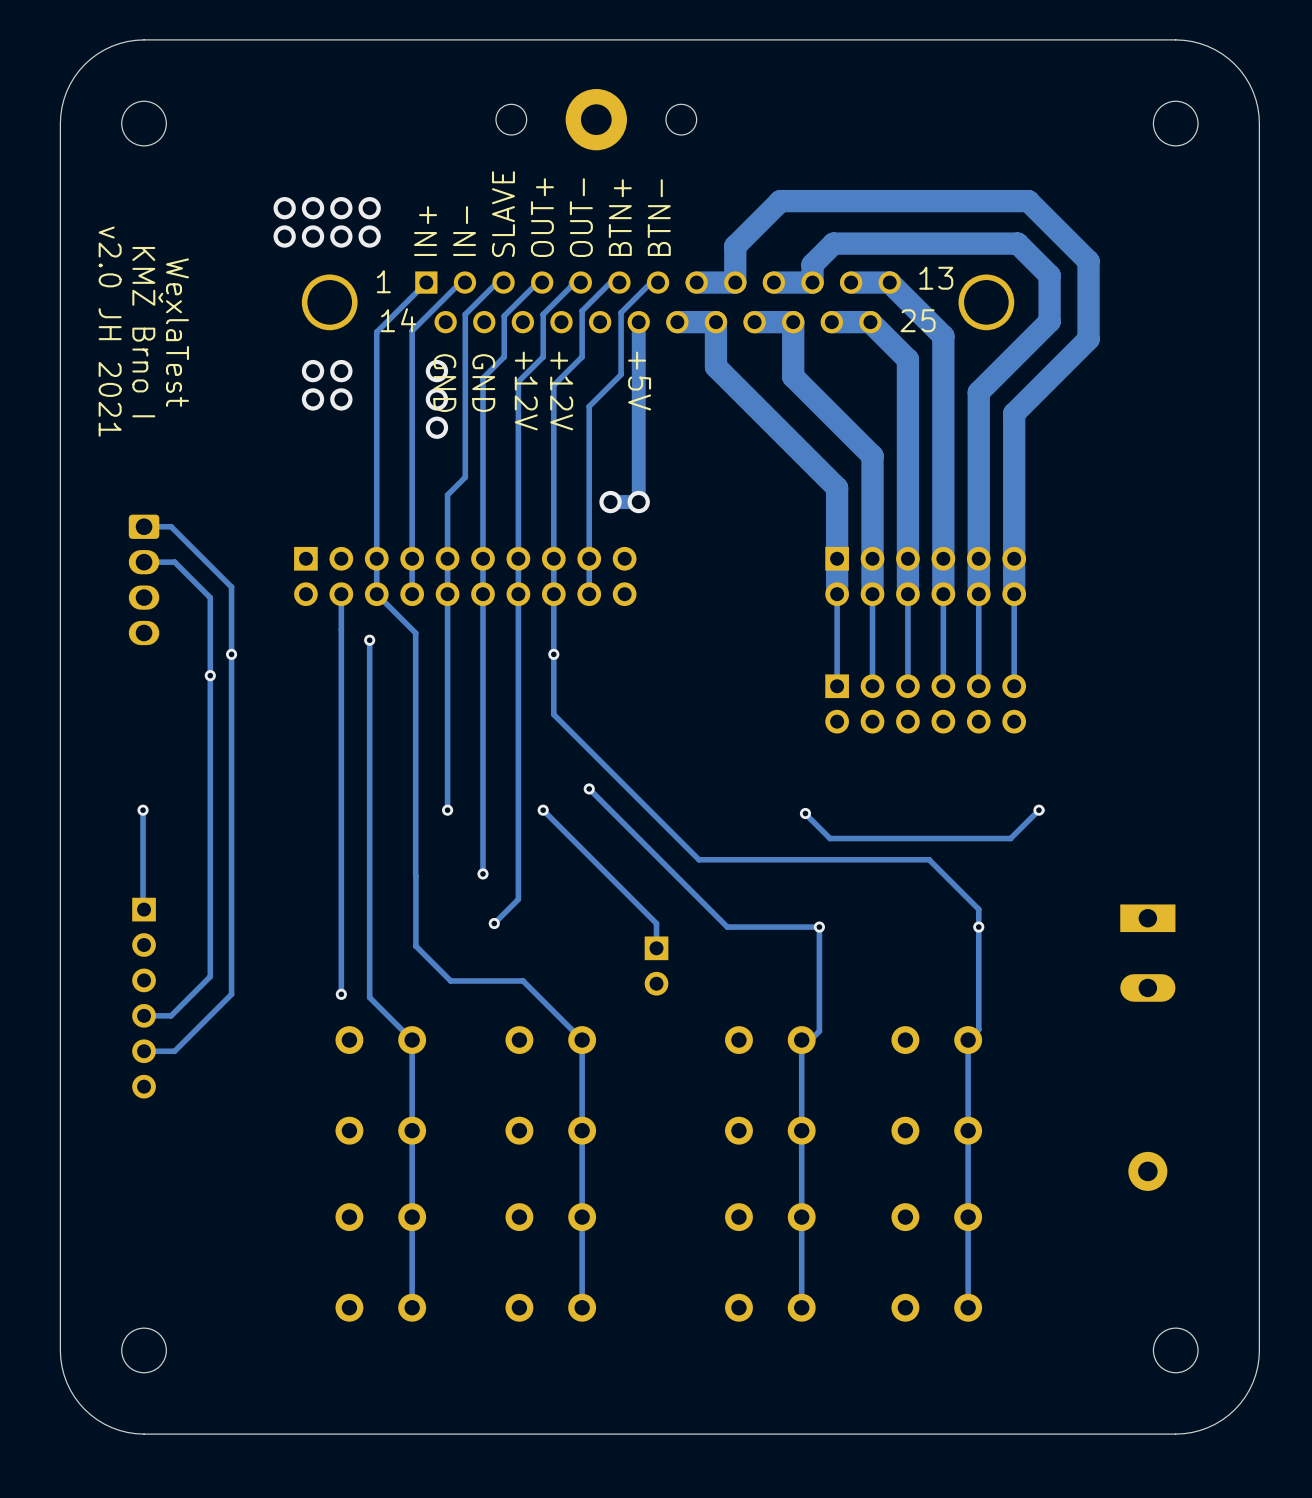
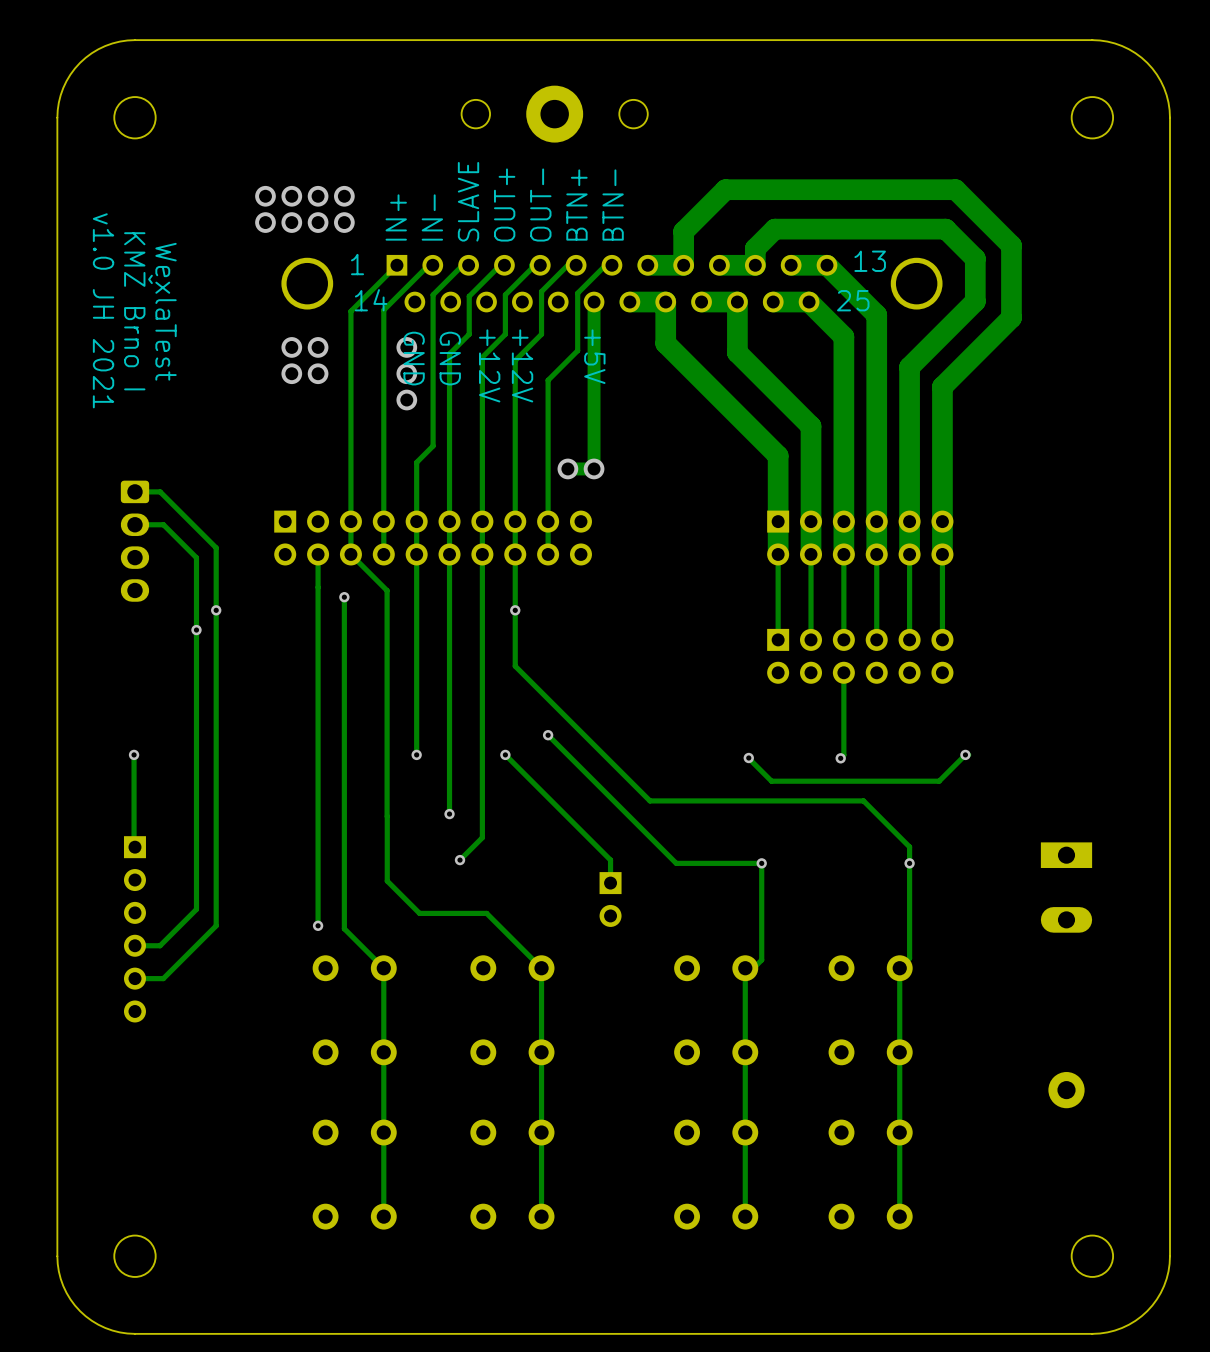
text: v2.0 JH 2021 (110, 331) -> v1.0 JH 2021 (103, 310)
track: none -> (843, 672) (843, 755) (840, 758)
via: none -> (840, 758)

